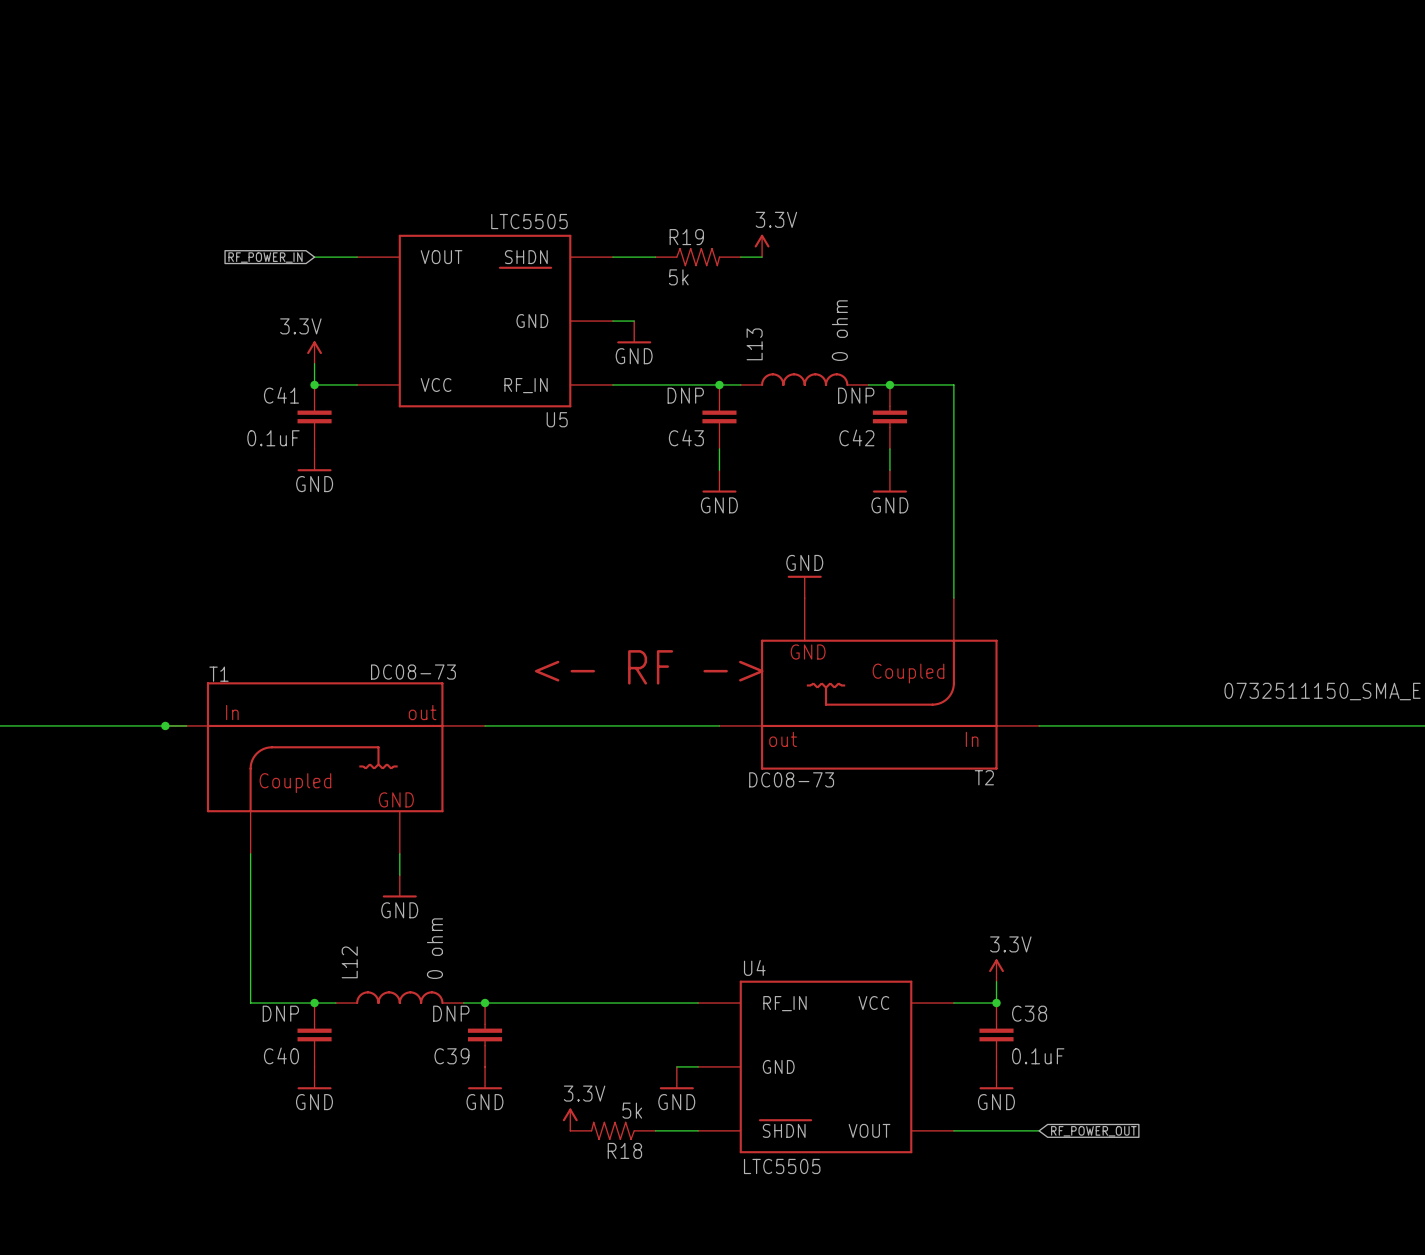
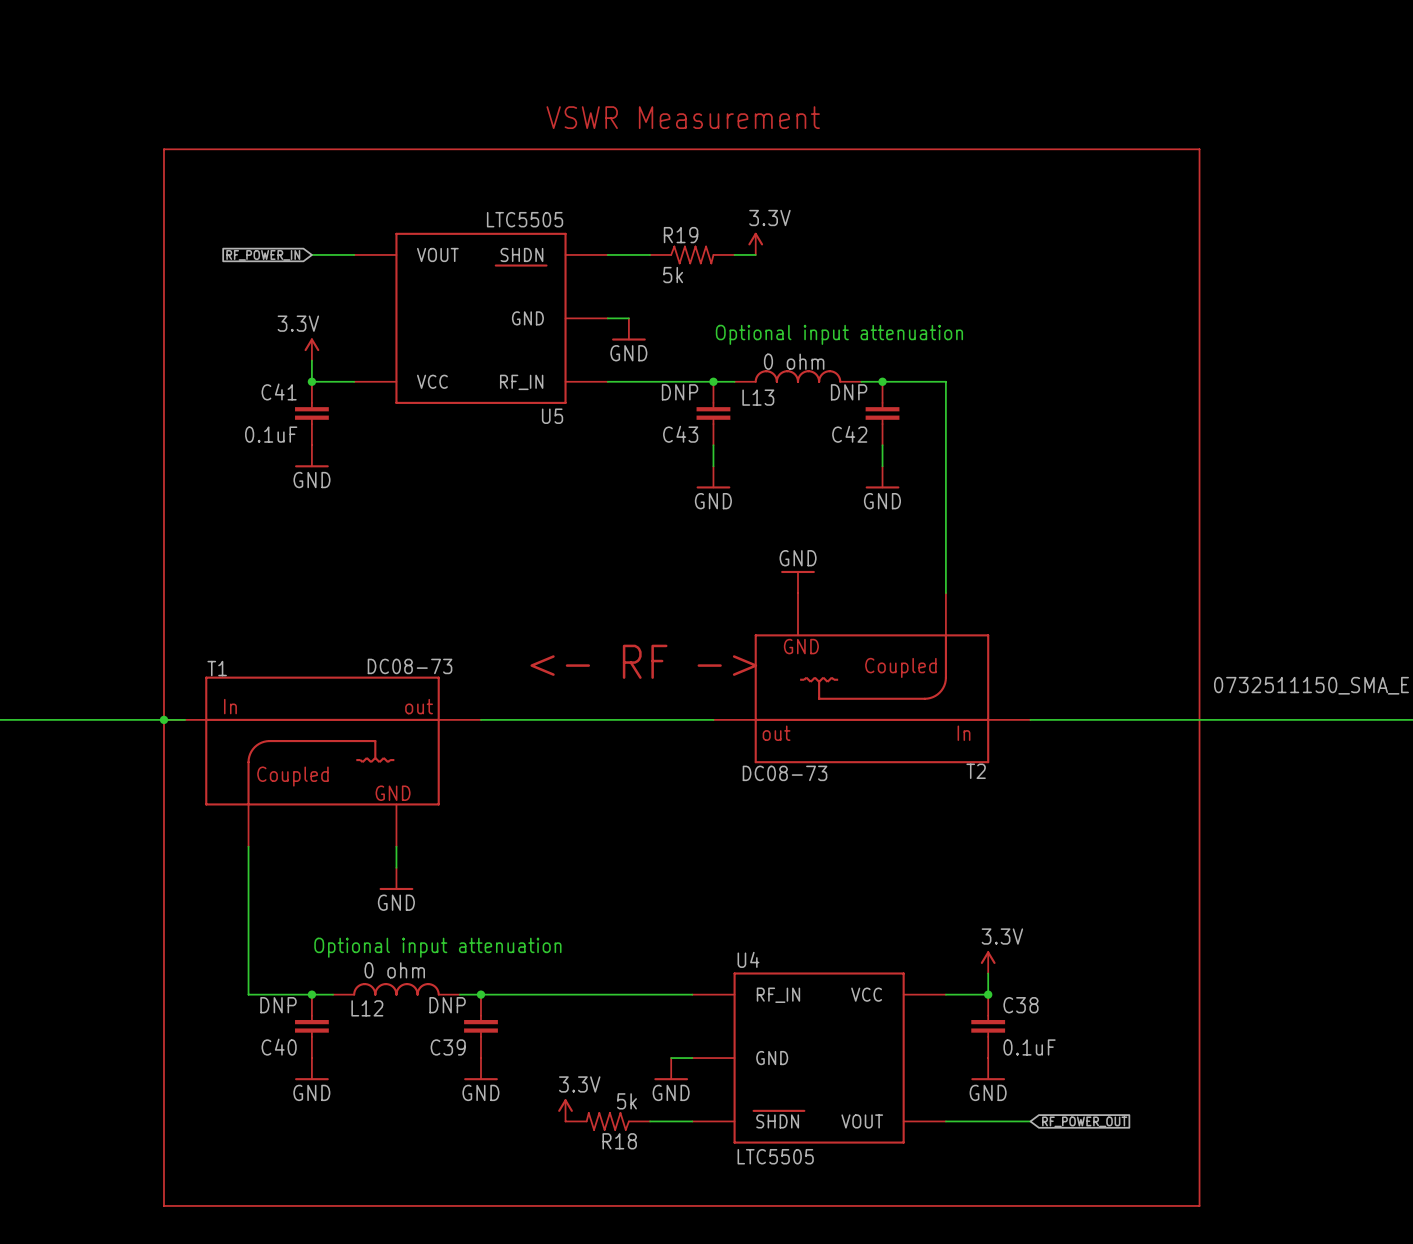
text: none -> VSWR Measurement (683, 117)
line: none -> (163, 149) (163, 1205) (1199, 1205) (1199, 149) (163, 149)
L13 value rotation: 0° (839, 330) -> 90° clockwise (794, 361)
text: none -> Optional input attenuation (839, 334)
L13 name rotation: 0° (754, 344) -> 90° clockwise (758, 397)
L13 name position: L13 (754, 344) -> L13 (758, 397)
L12 value rotation: 0° (434, 948) -> 90° clockwise (394, 970)
text: none -> Optional input attenuation (437, 947)
L12 name rotation: 0° (349, 962) -> 90° clockwise (367, 1008)
L12 name position: L12 (349, 962) -> L12 (367, 1008)

